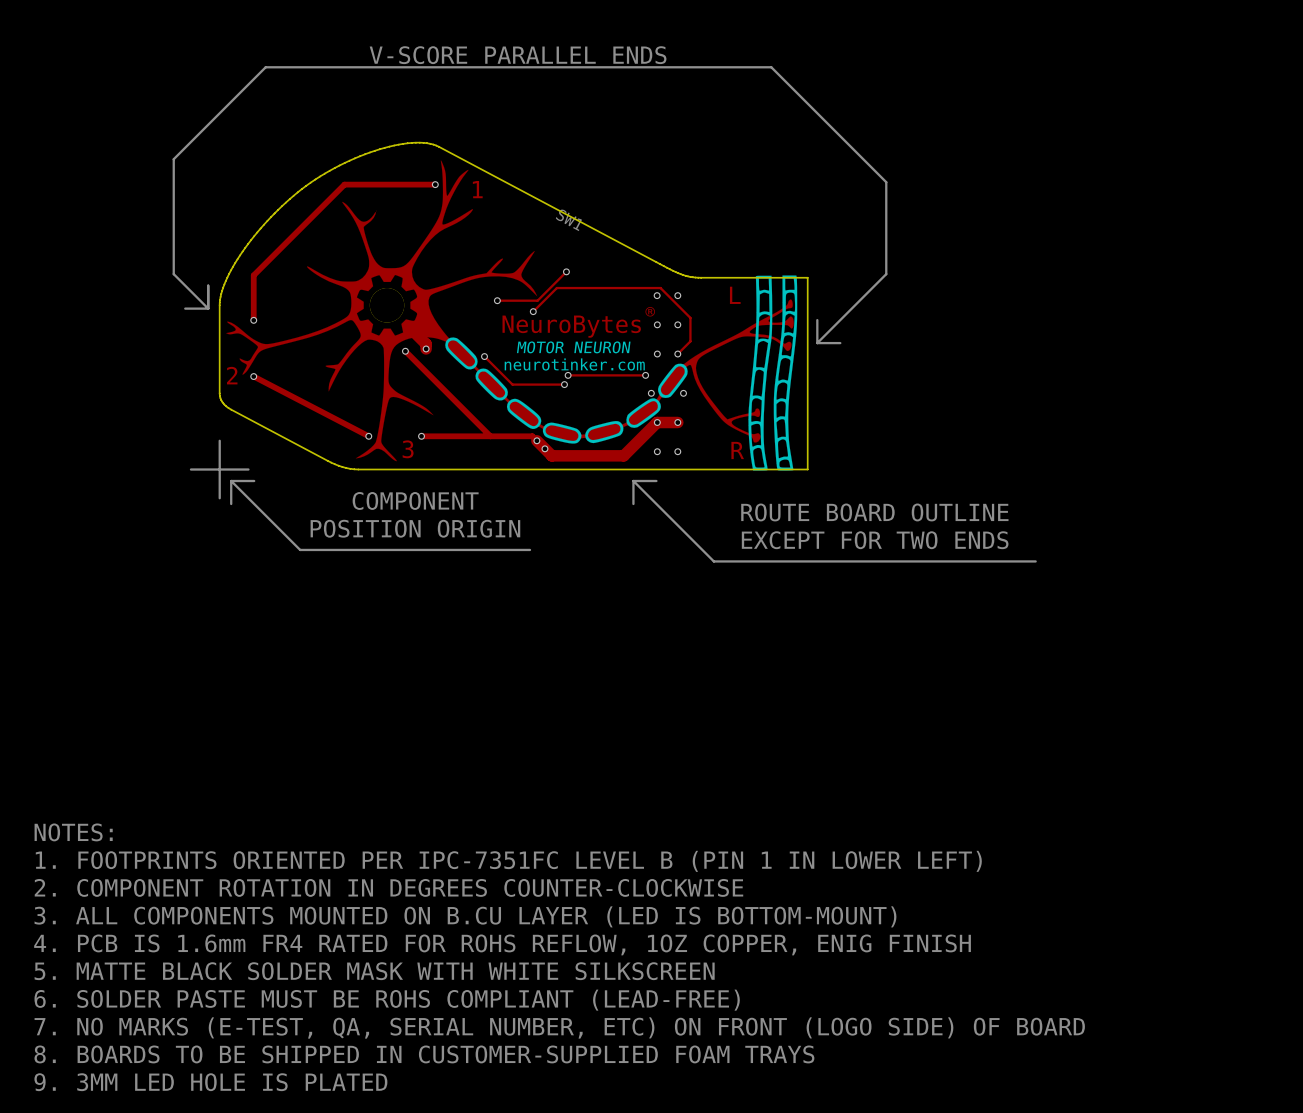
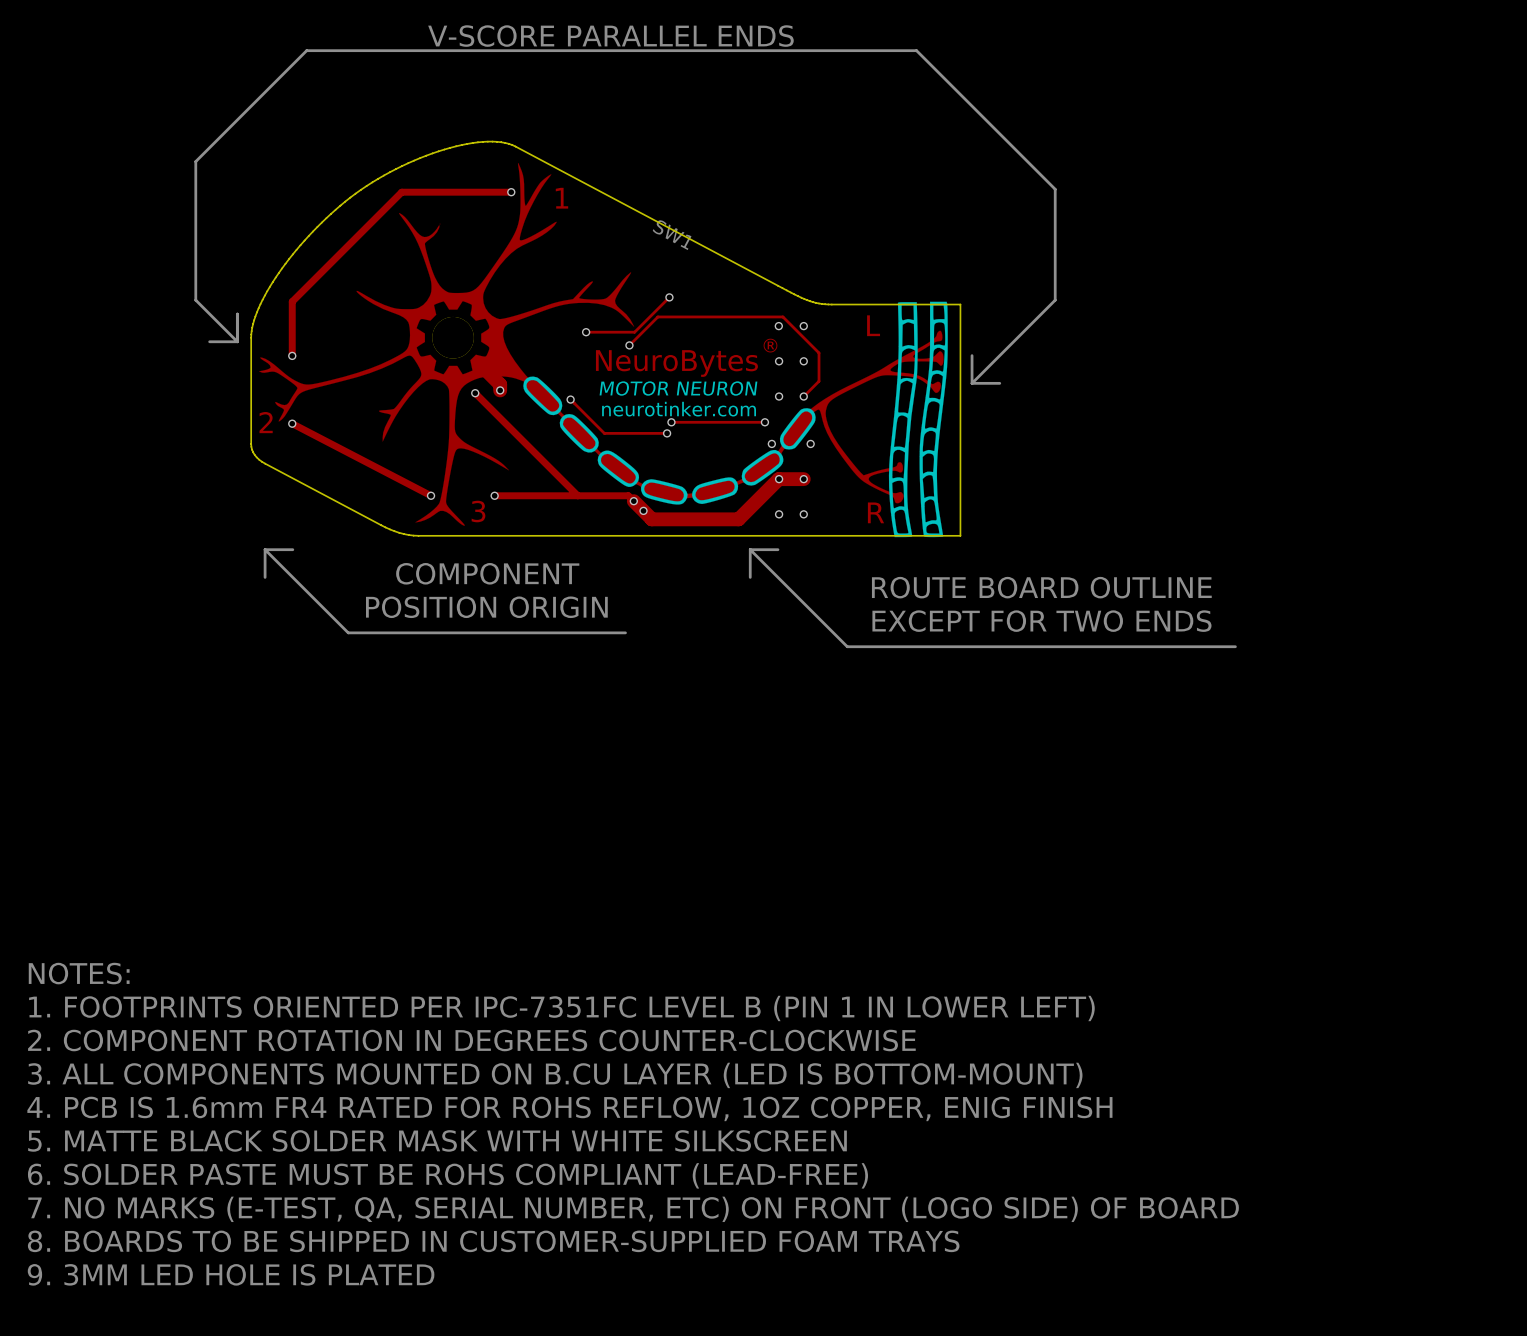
line: (219, 440) (219, 498) -> none
line: (190, 469) (248, 469) -> none

